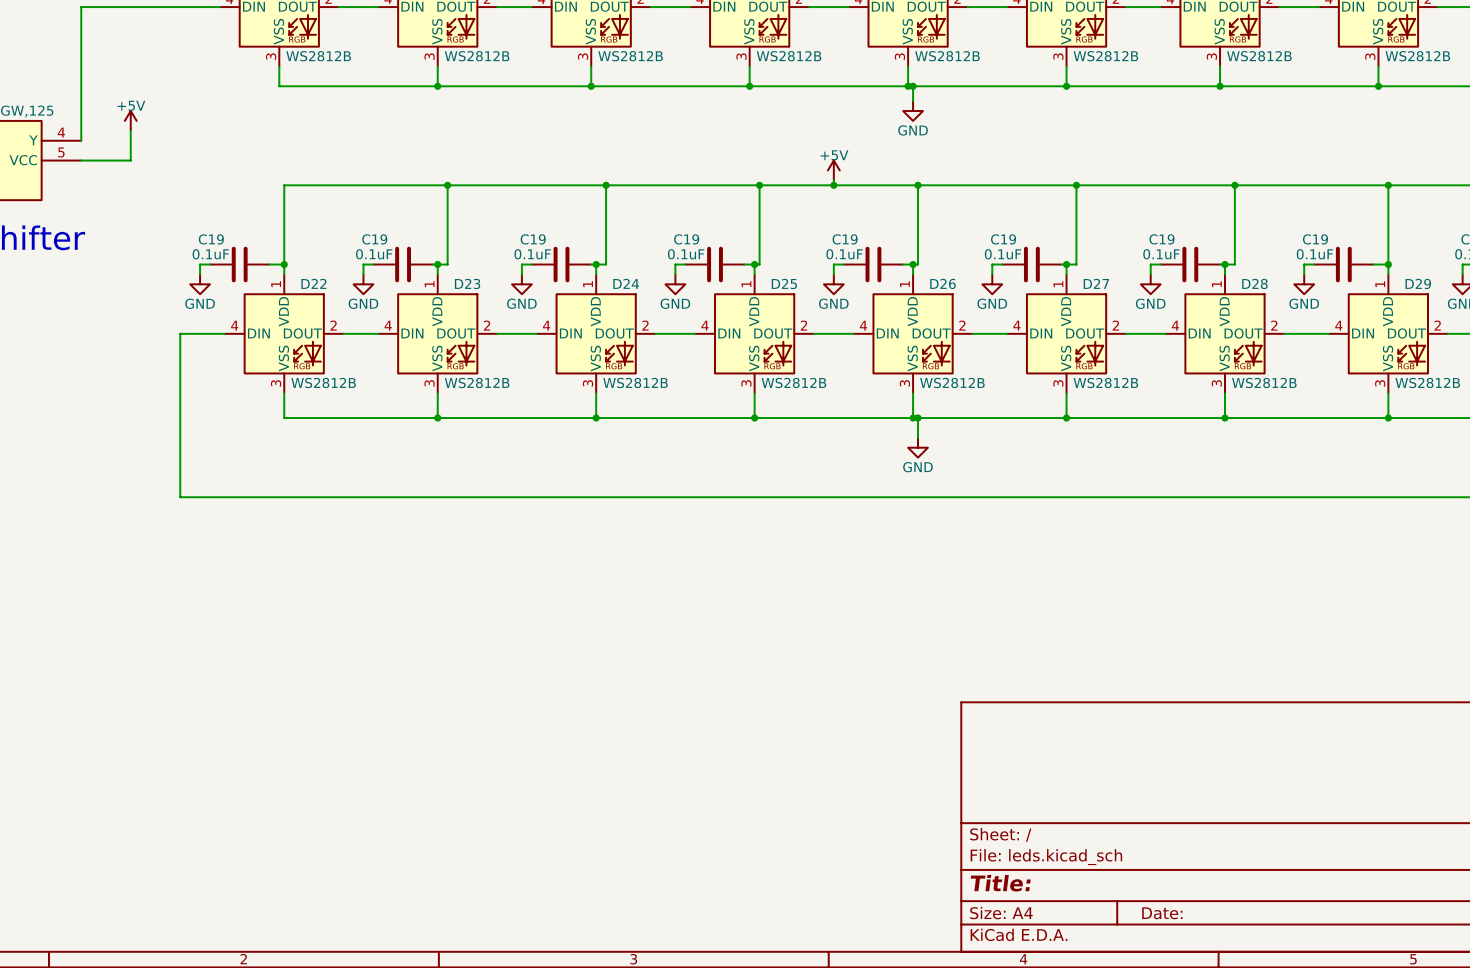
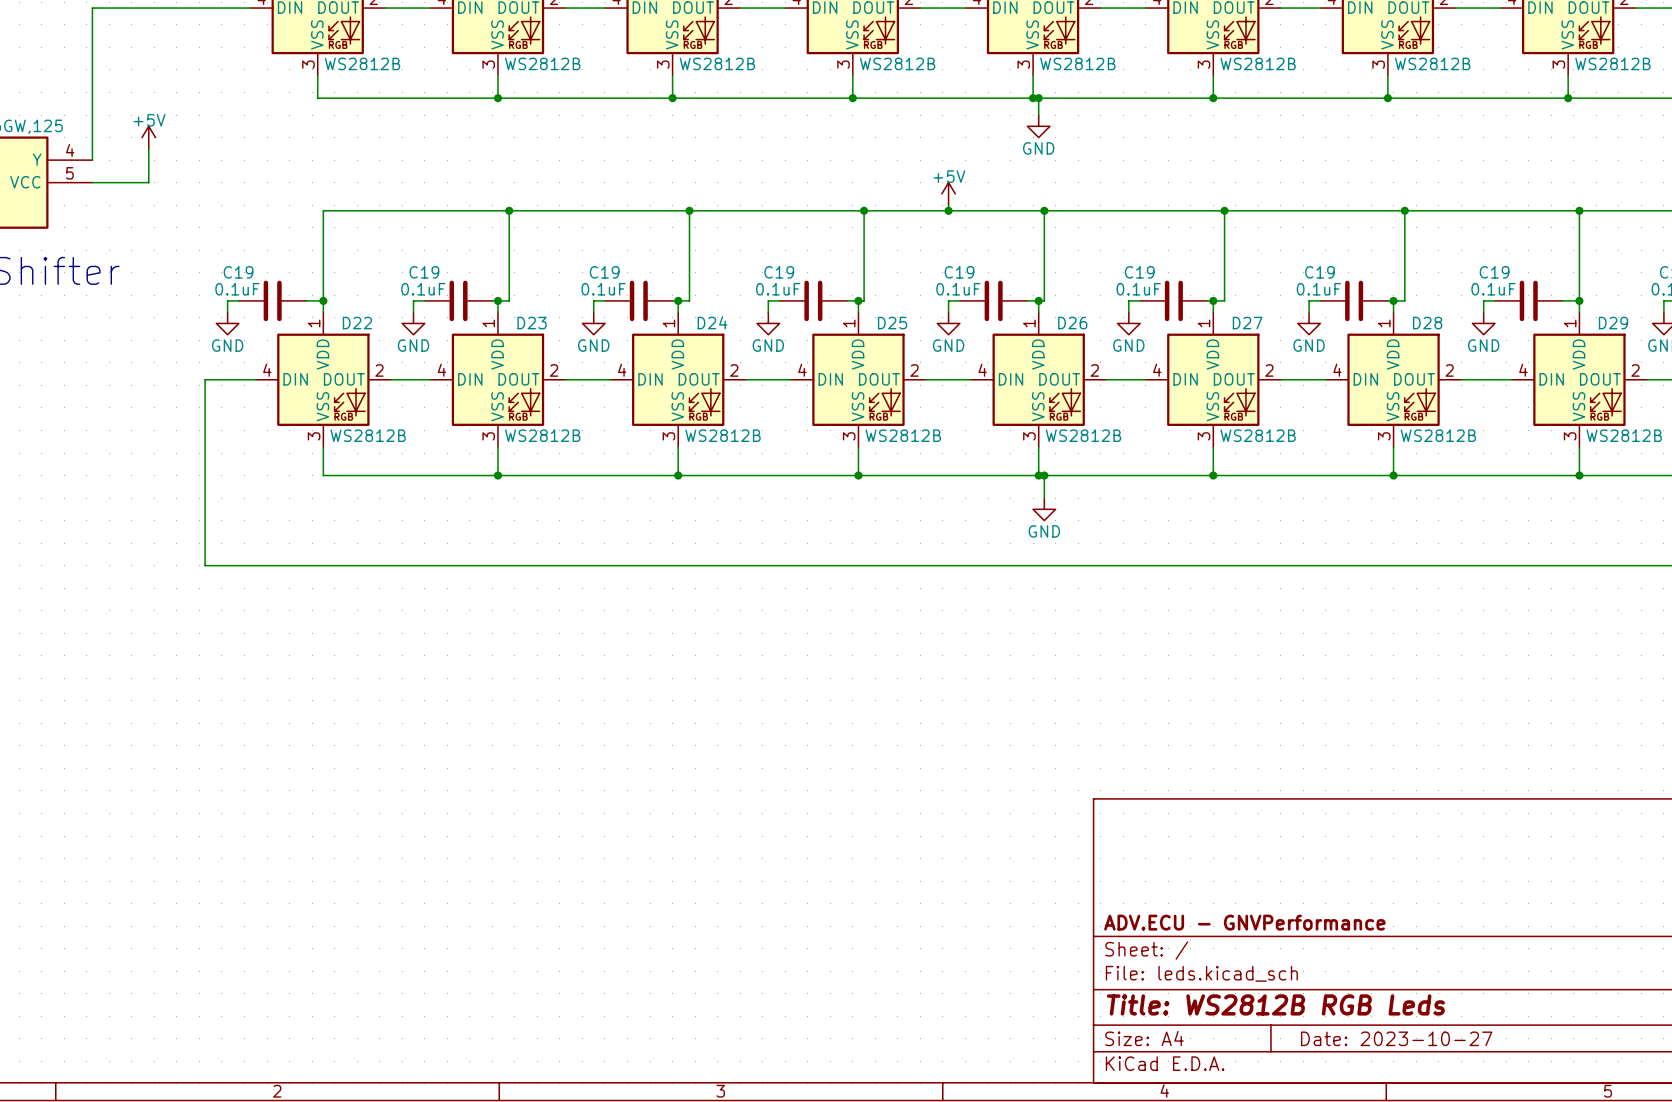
title block: none -> ADV.ECU - GNVPerformance (1244, 922)
title block: Title: (1000, 883) -> Title: WS2812B RGB Leds (1275, 1004)
title block: Date: (1162, 913) -> Date: 2023-10-27 (1396, 1038)

